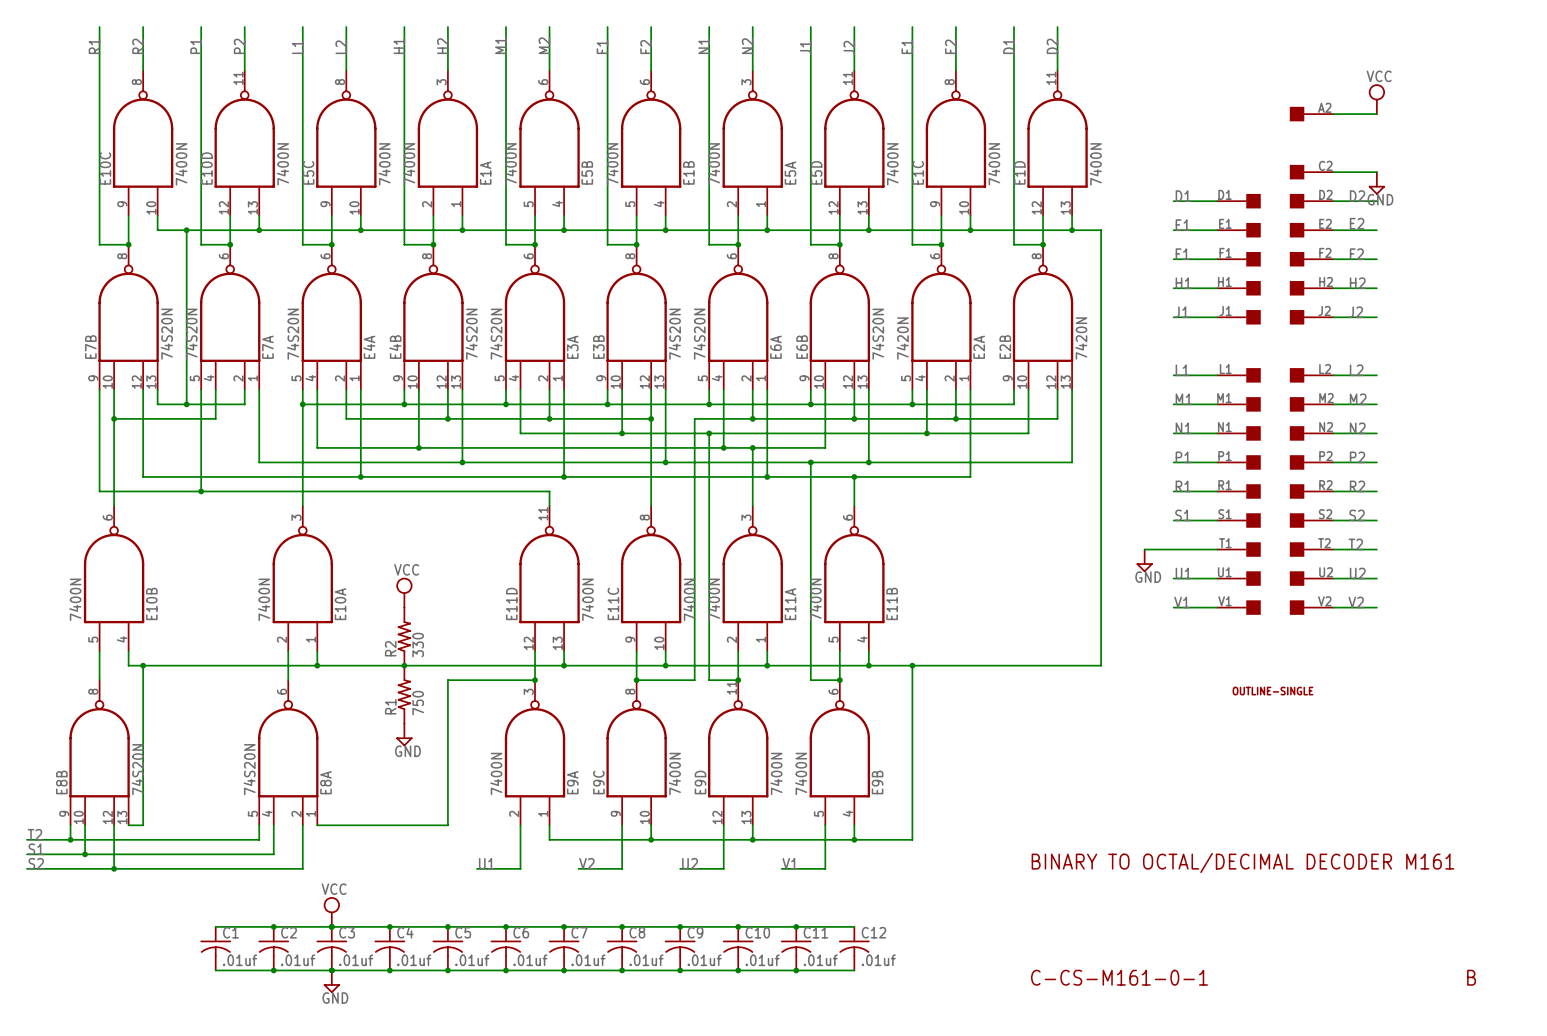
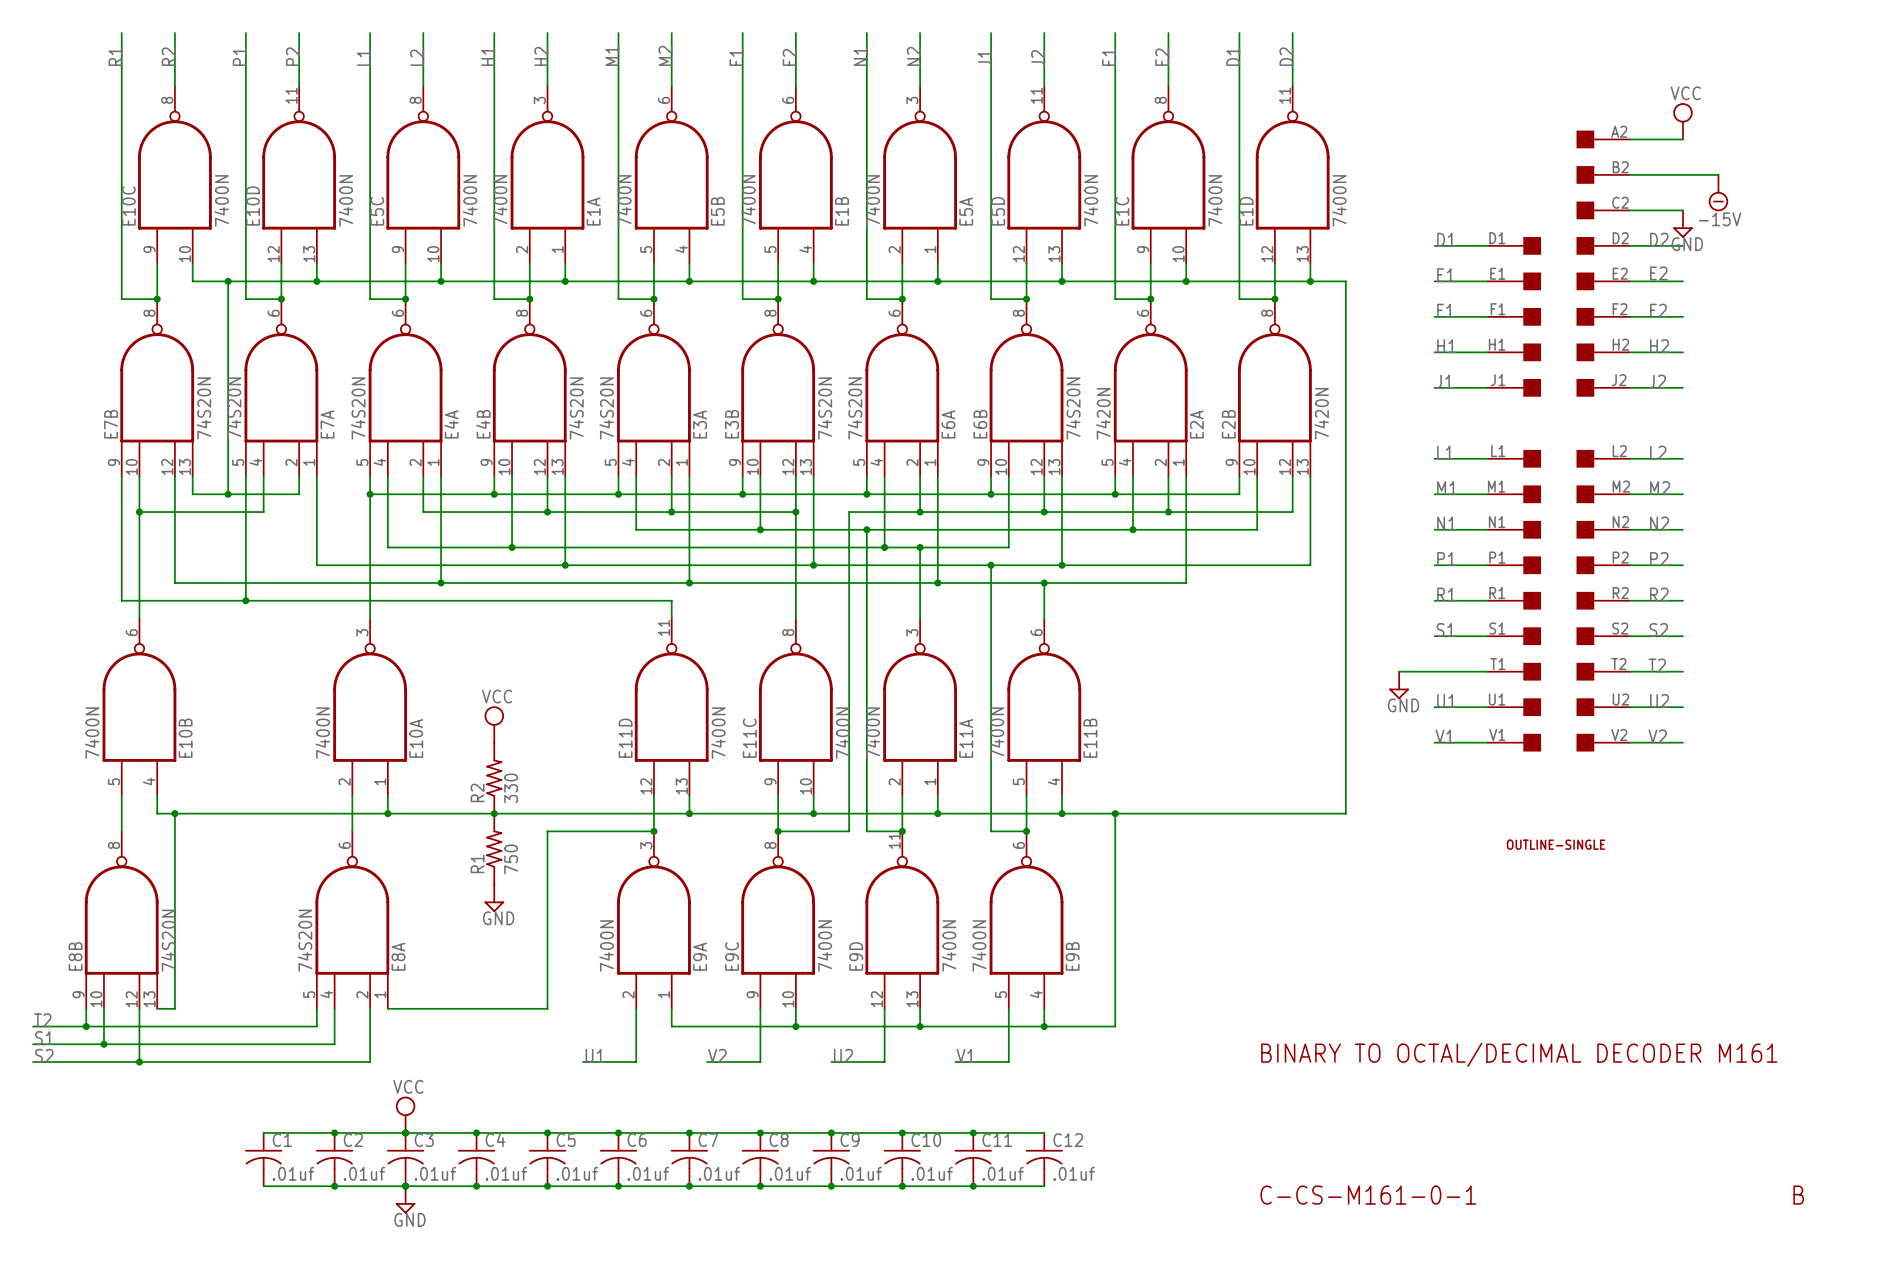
part: none -> (1603, 174)
wire: none -> (1629, 174) (1718, 174)
power symbol: none -> -15V (1718, 193)

